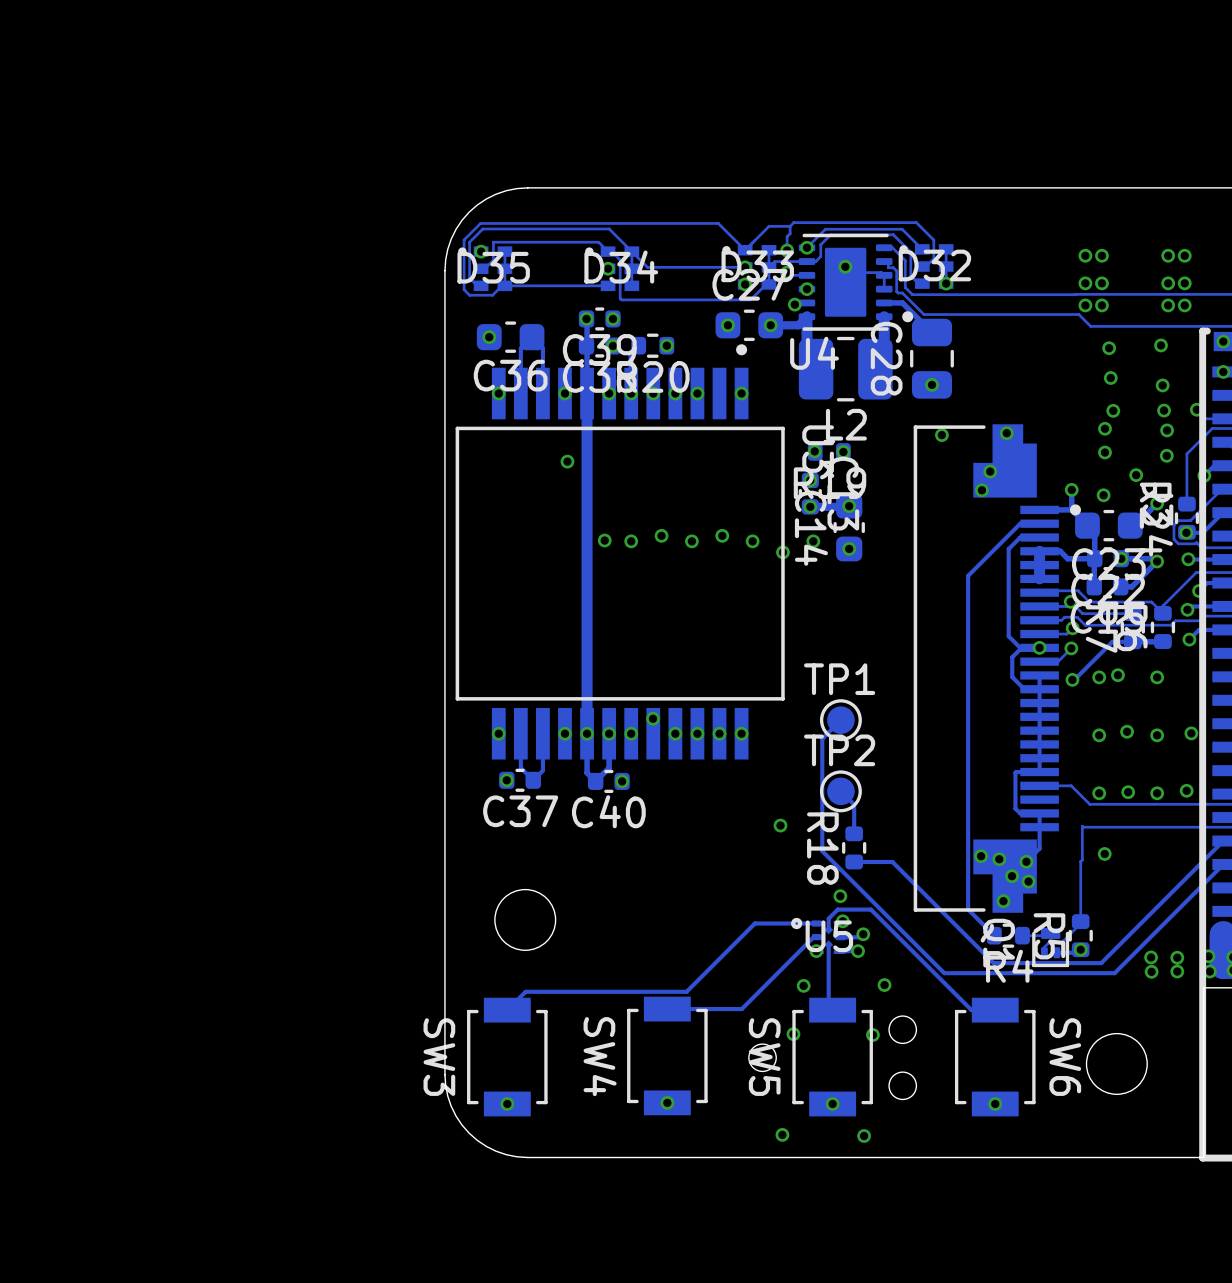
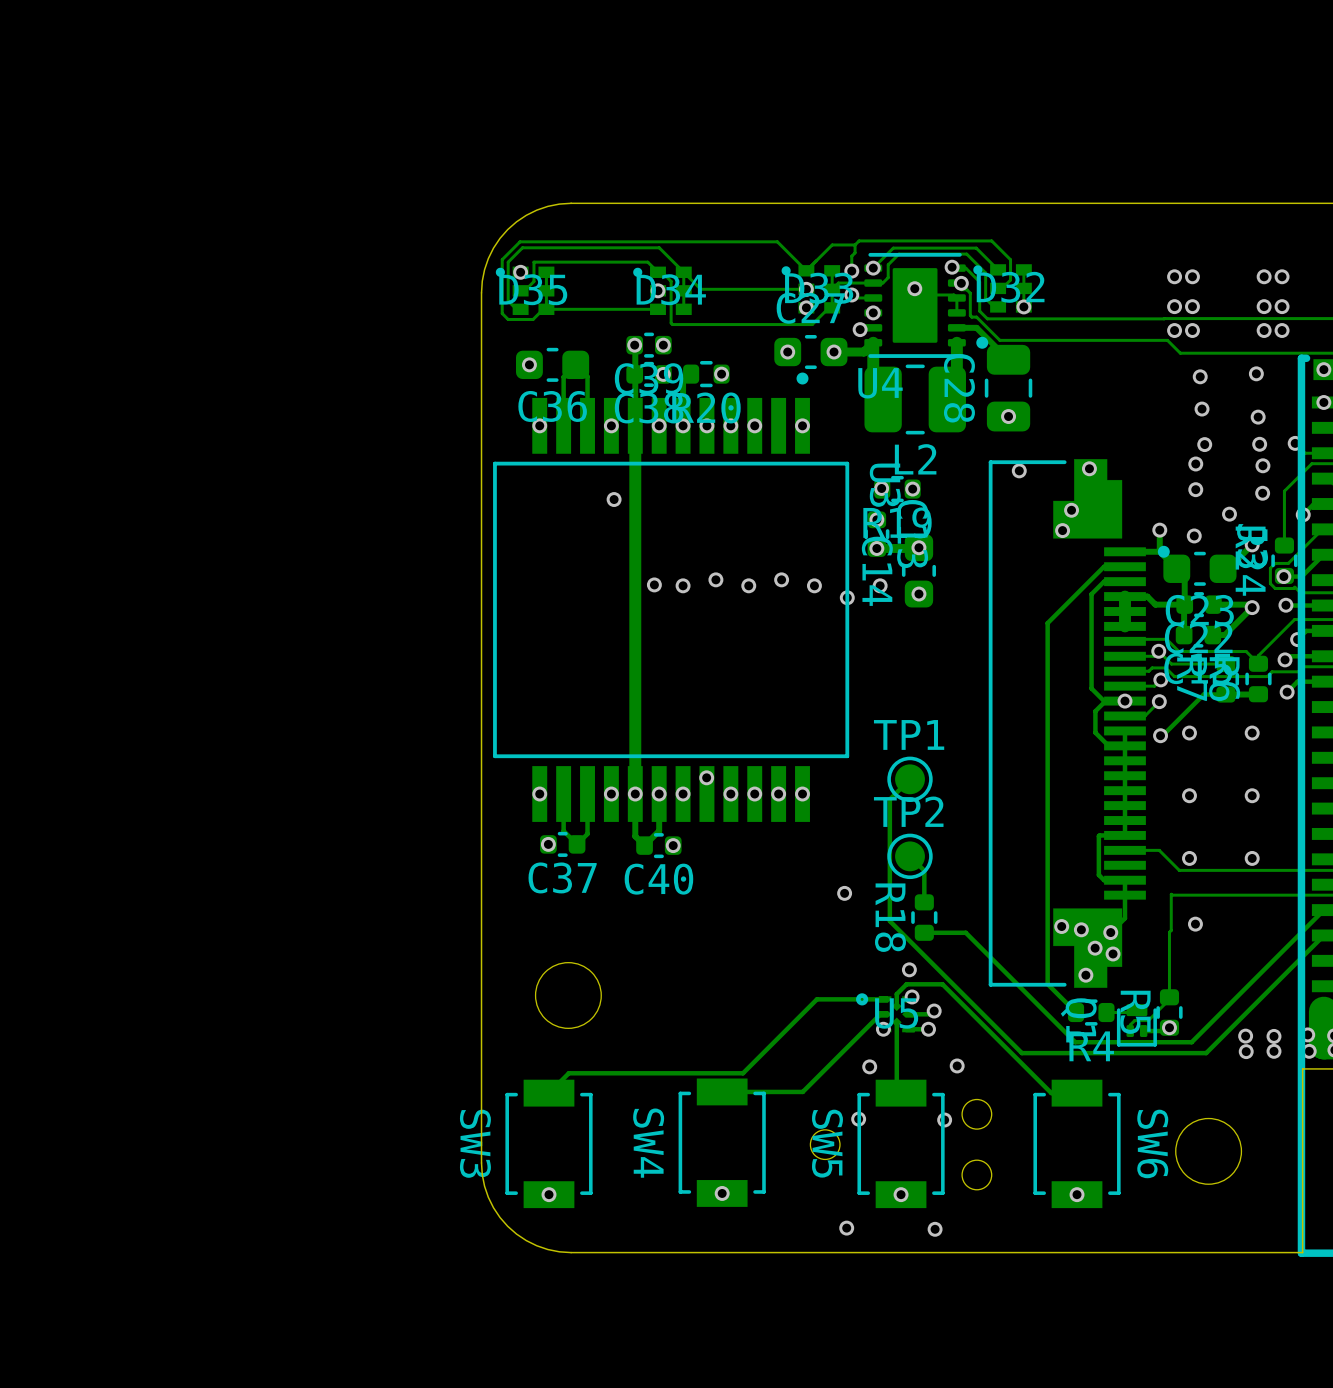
via: none -> (952, 267)
via: none -> (961, 283)
via: (1121, 558) -> none
via: (1117, 675) -> none
via: (1127, 731) -> none
via: (1191, 733) -> none
via: (1186, 790) -> none
via: (1128, 792) -> none

